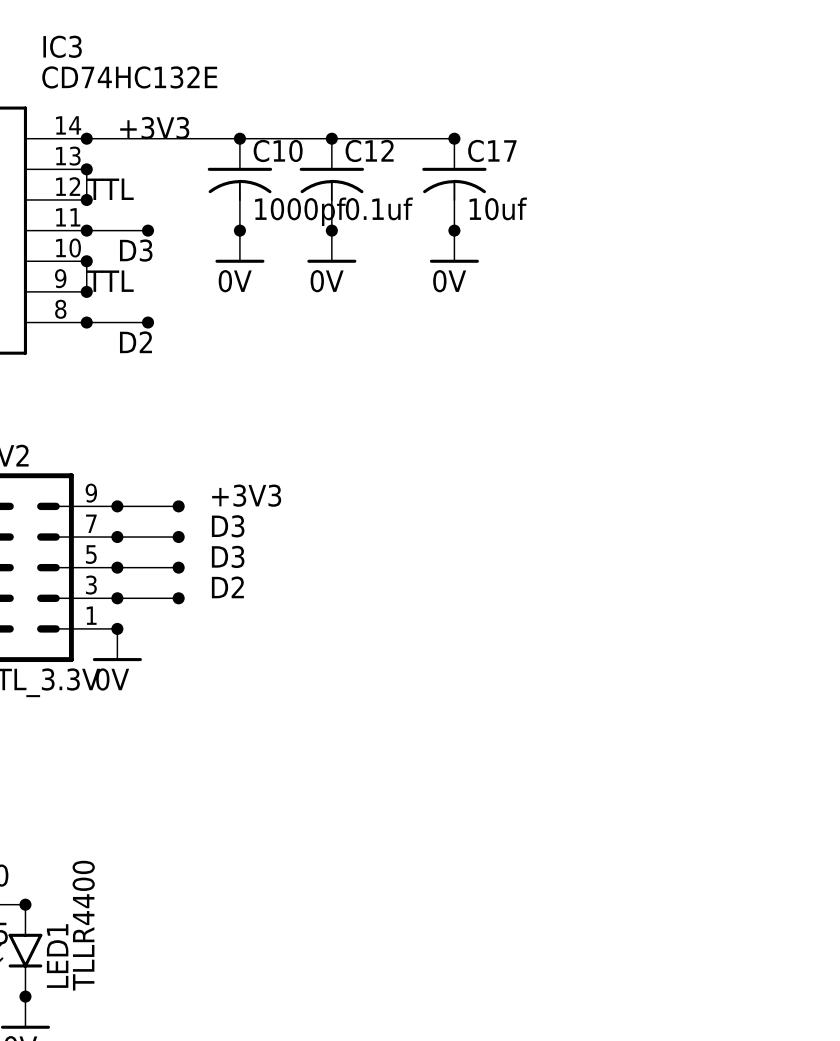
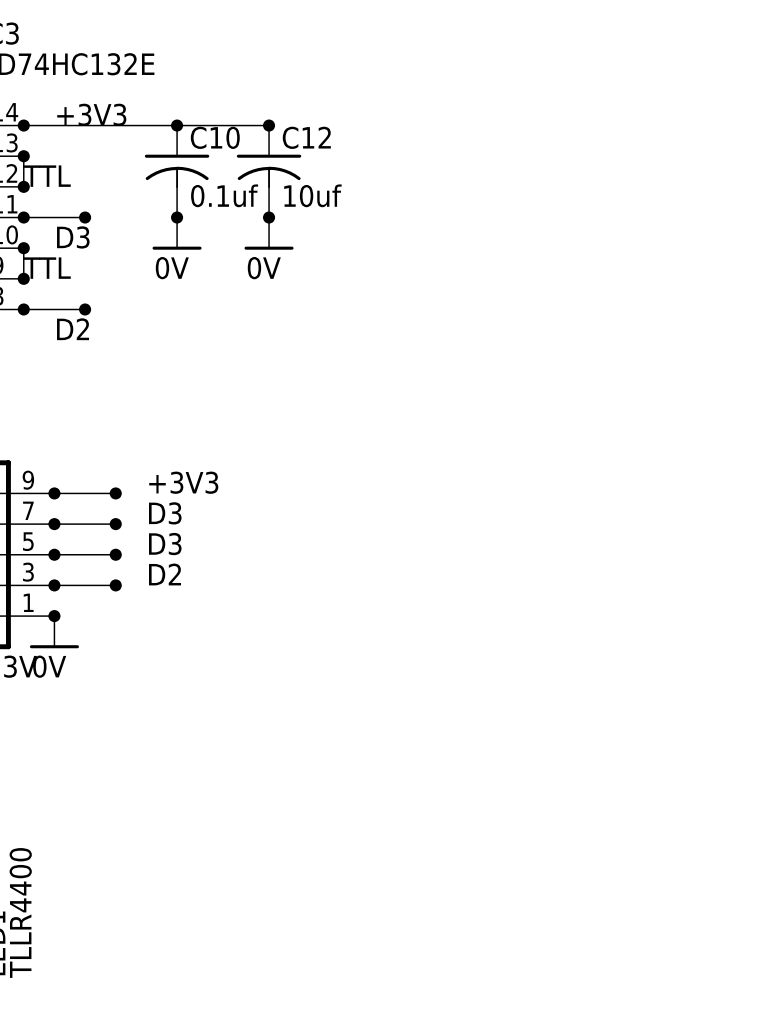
wire: (331, 138) (454, 138) -> none
junction: (454, 138) -> none
C17: 10uf (454, 184) -> none
C12 value: 0.1uf (379, 208) -> 10uf (312, 195)
C10 value: 1000pf (300, 211) -> 0.1uf (224, 195)
junction: (454, 230) -> none
power symbol: 0V (454, 246) -> none

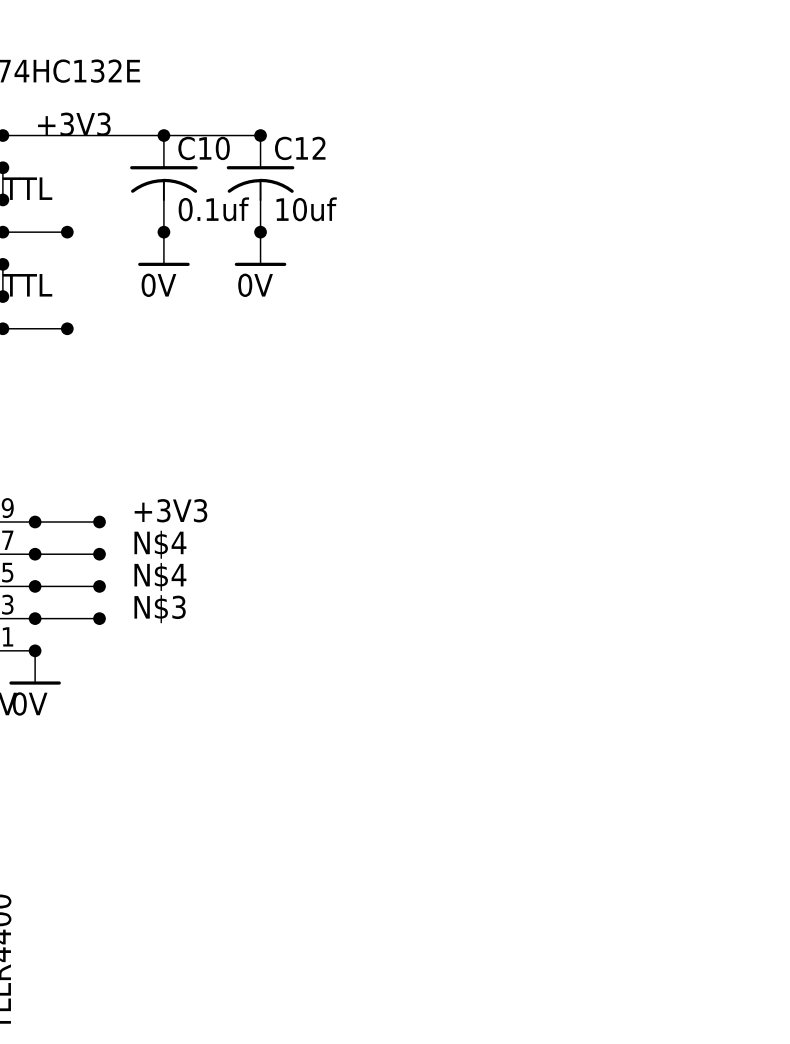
label: D3 (73, 237) -> none
label: D2 (73, 329) -> none
label: D3 (165, 513) -> N$4 (160, 544)
label: D3 (165, 544) -> N$4 (160, 576)
label: D2 (165, 574) -> N$3 (160, 609)

